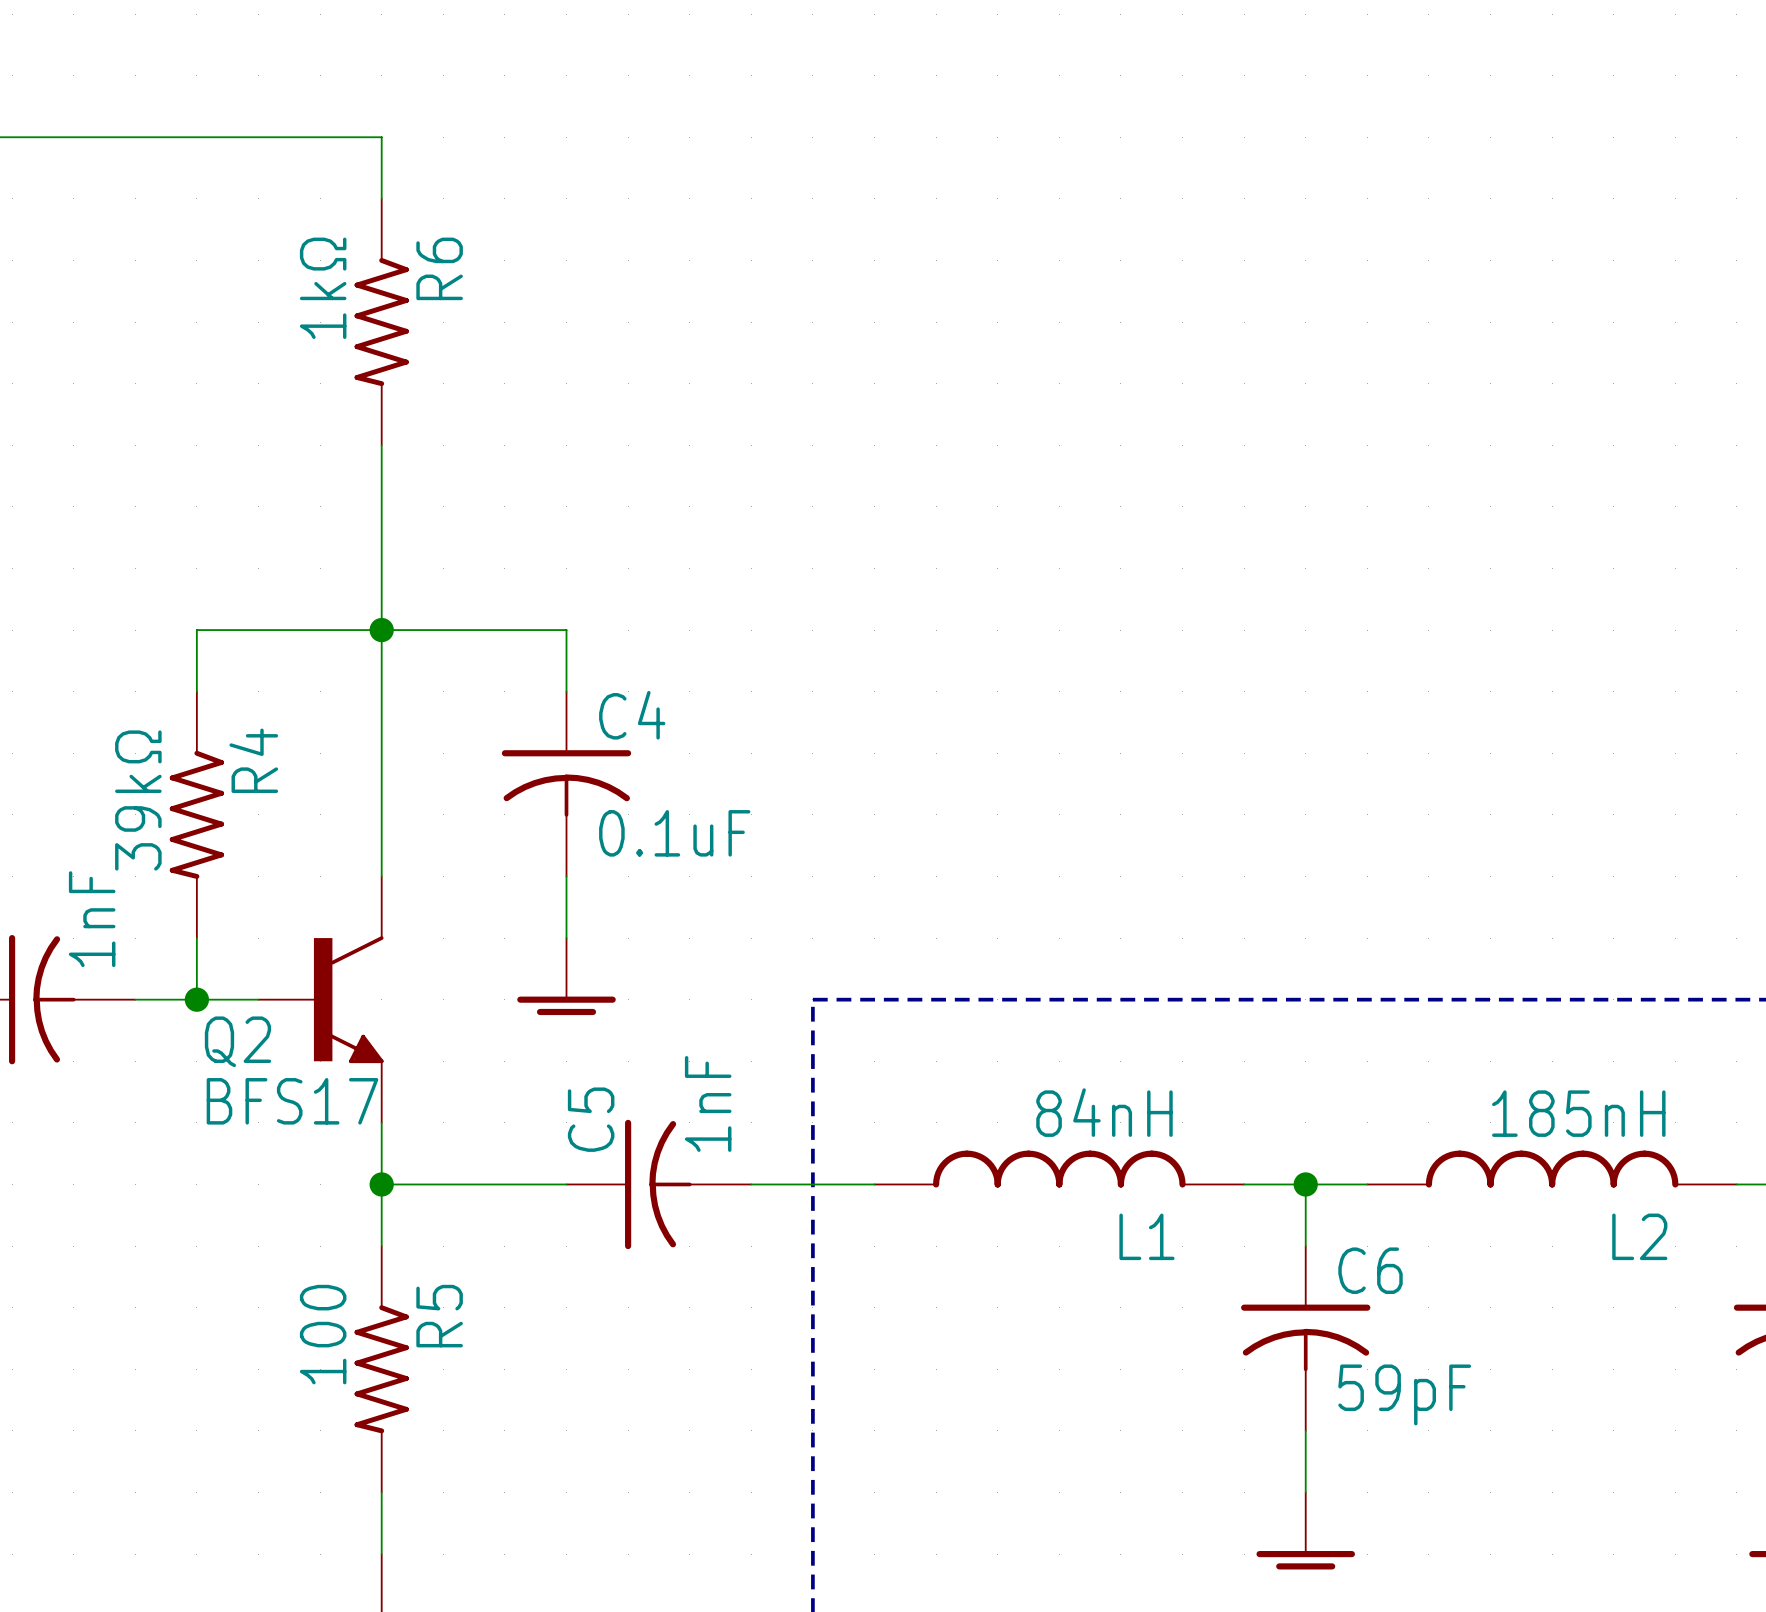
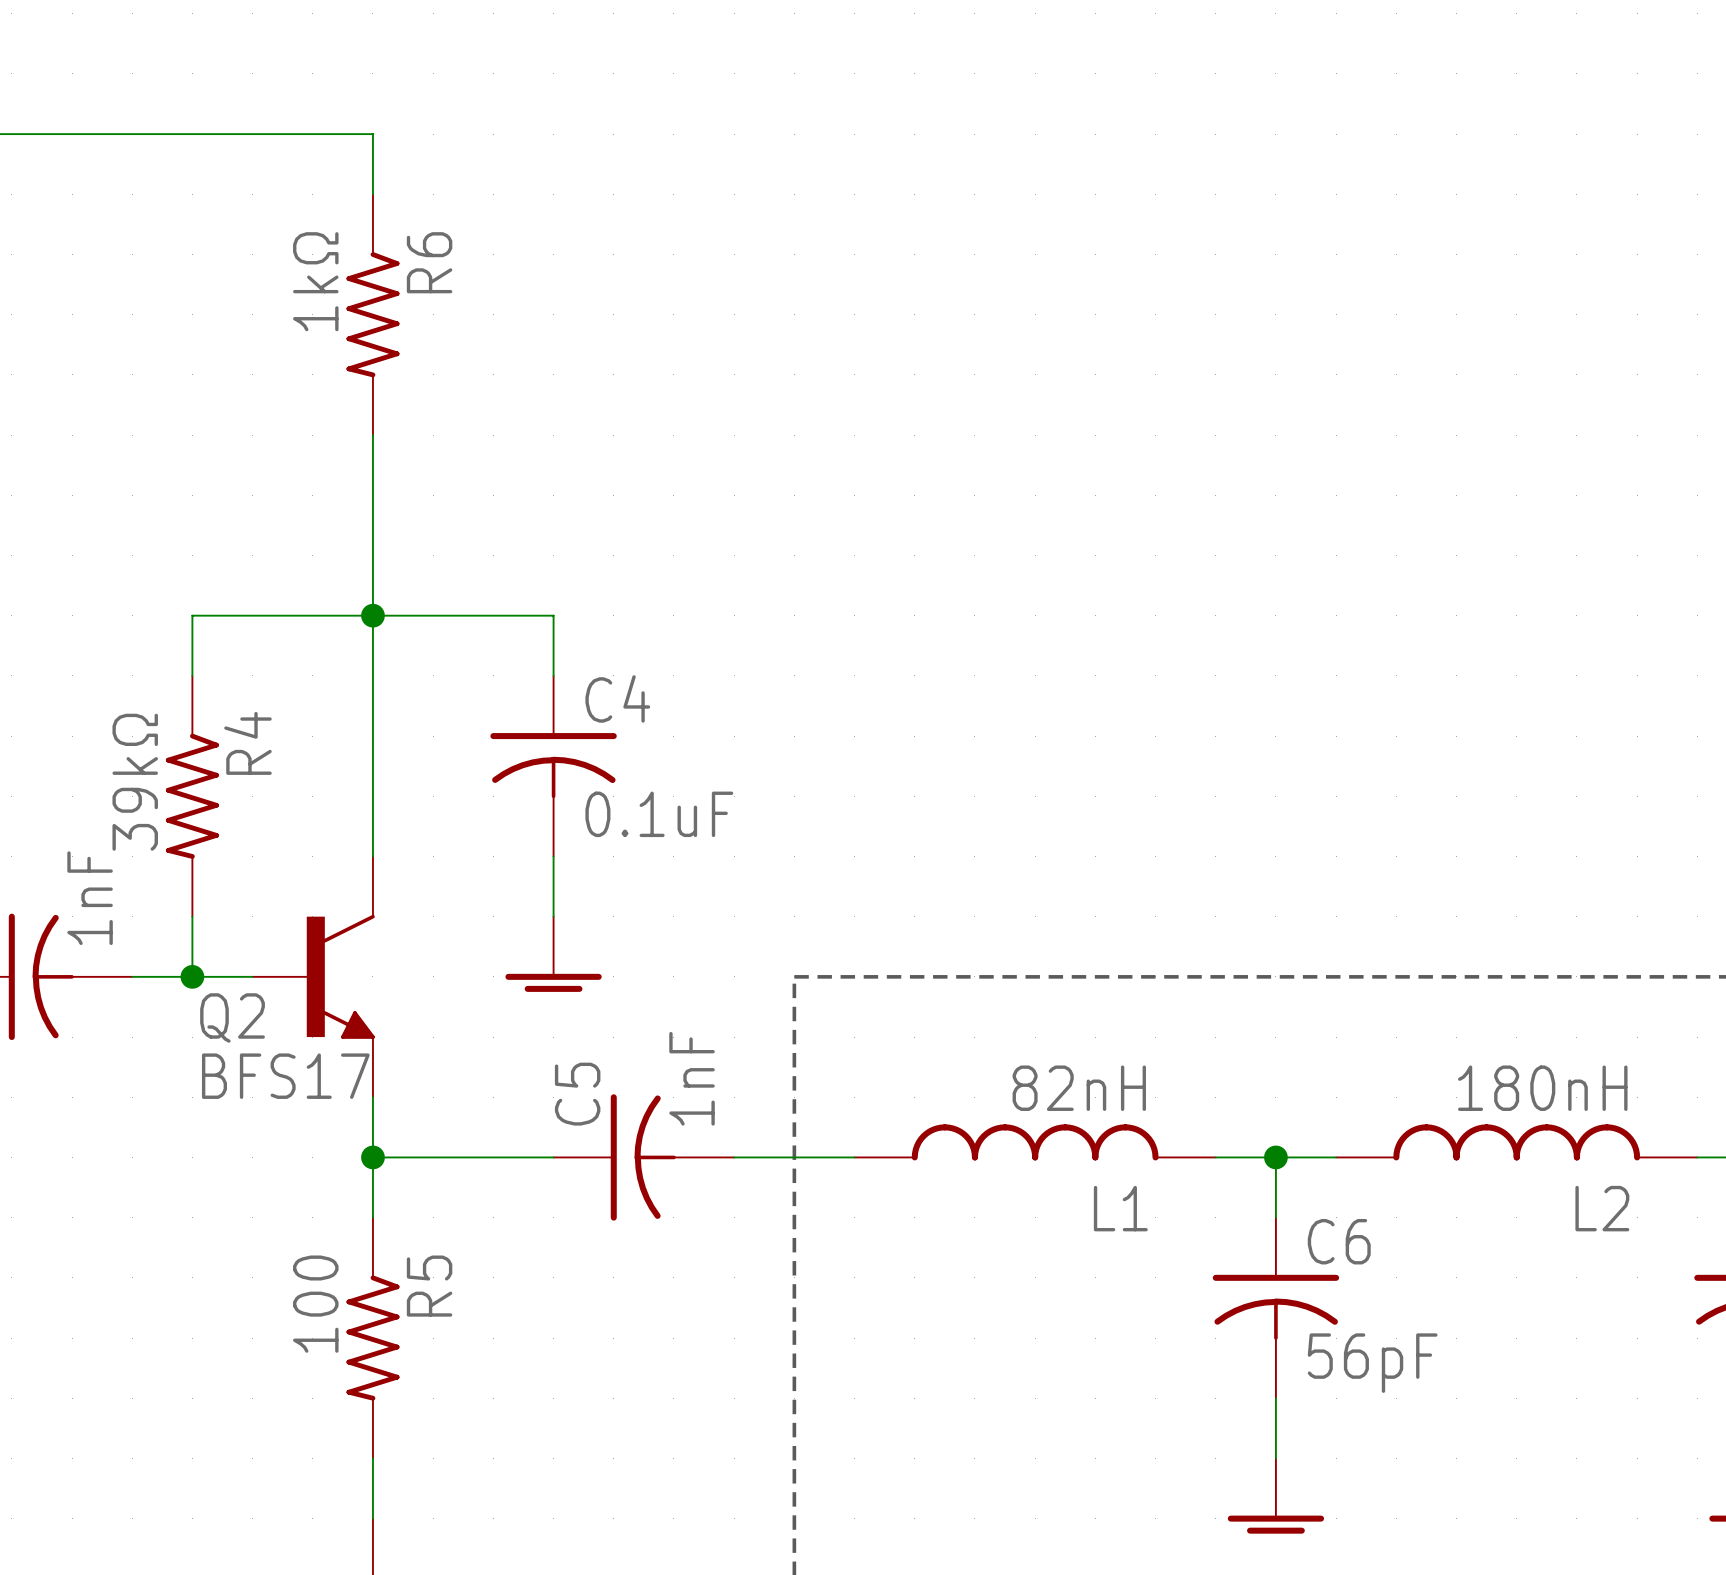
L1 value: 84nH (1104, 1112) -> 82nH (1079, 1088)
L2 value: 185nH (1578, 1113) -> 180nH (1542, 1088)
C6 value: 59pF (1404, 1394) -> 56pF (1372, 1363)

